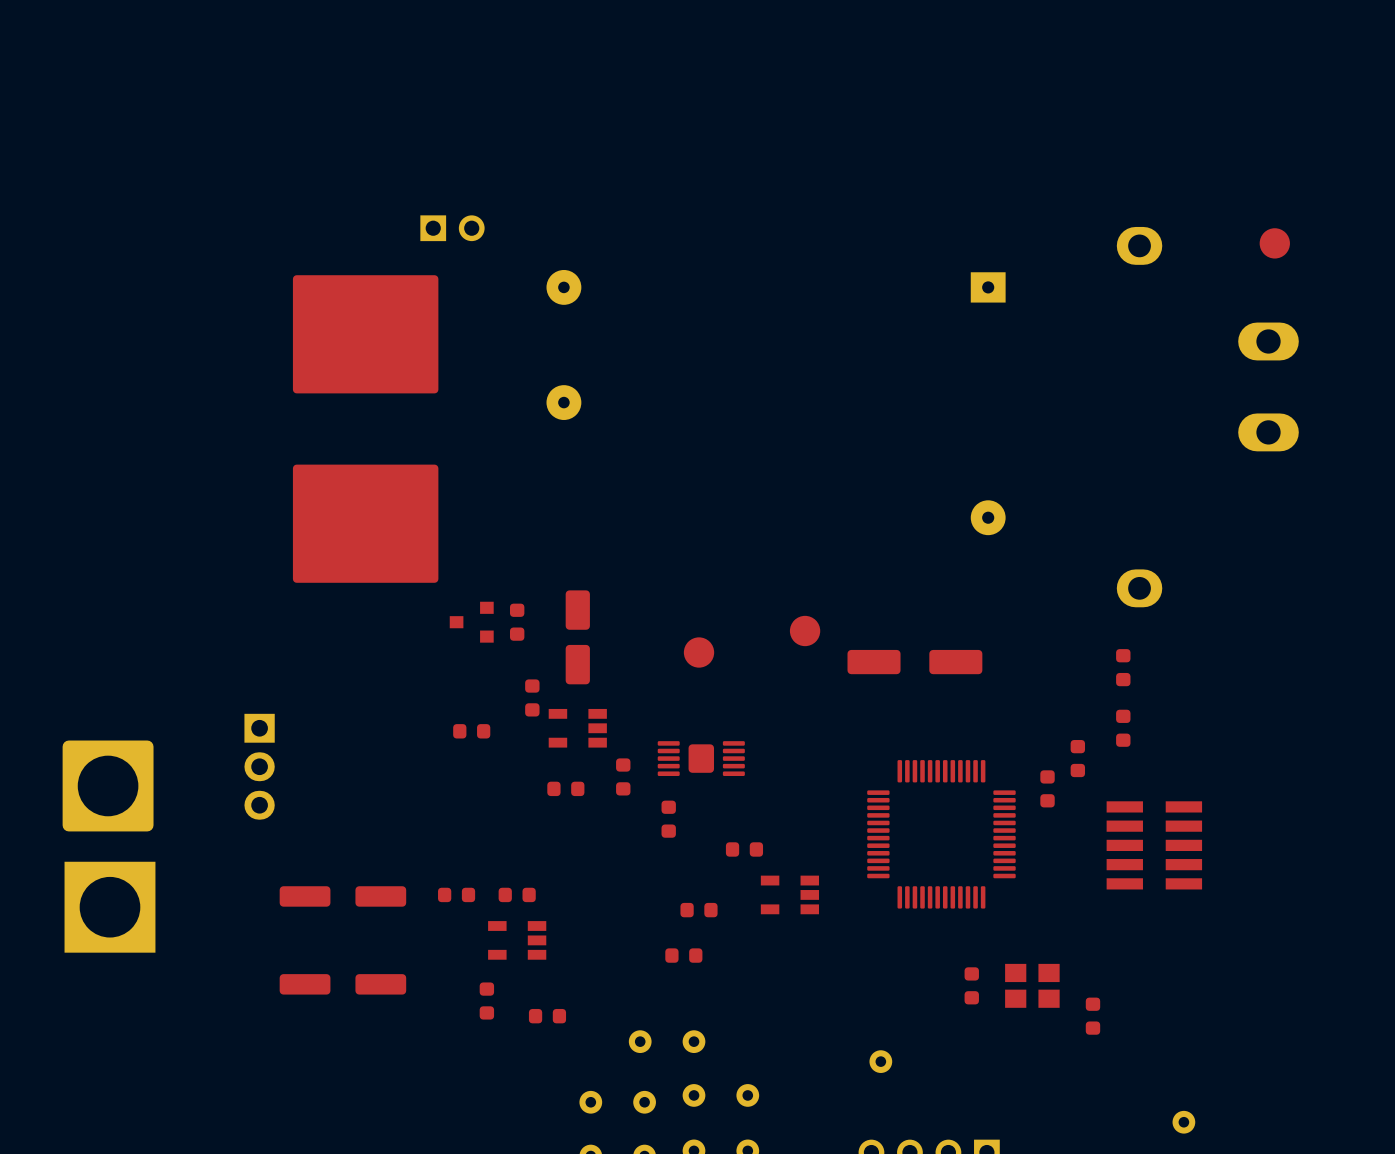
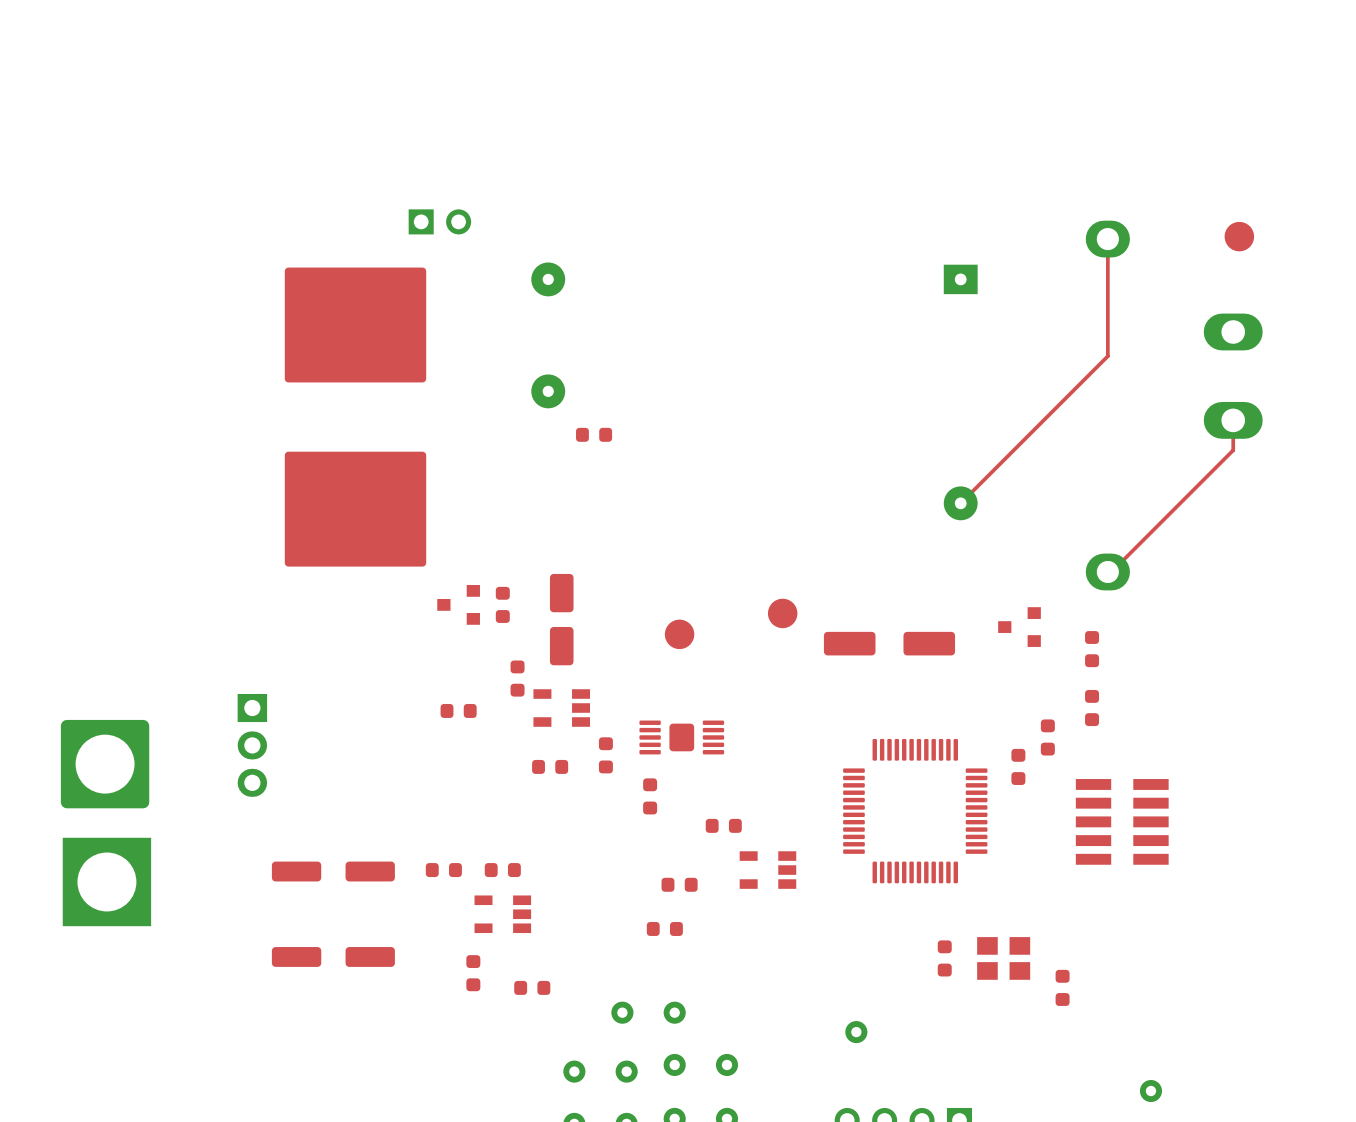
top track: none -> (1107, 239) (1107, 356) (960, 503)
top track: none -> (1233, 420) (1233, 450) (1111, 571) (1107, 571)
part: none -> (594, 434)
part: none -> (1019, 627)

